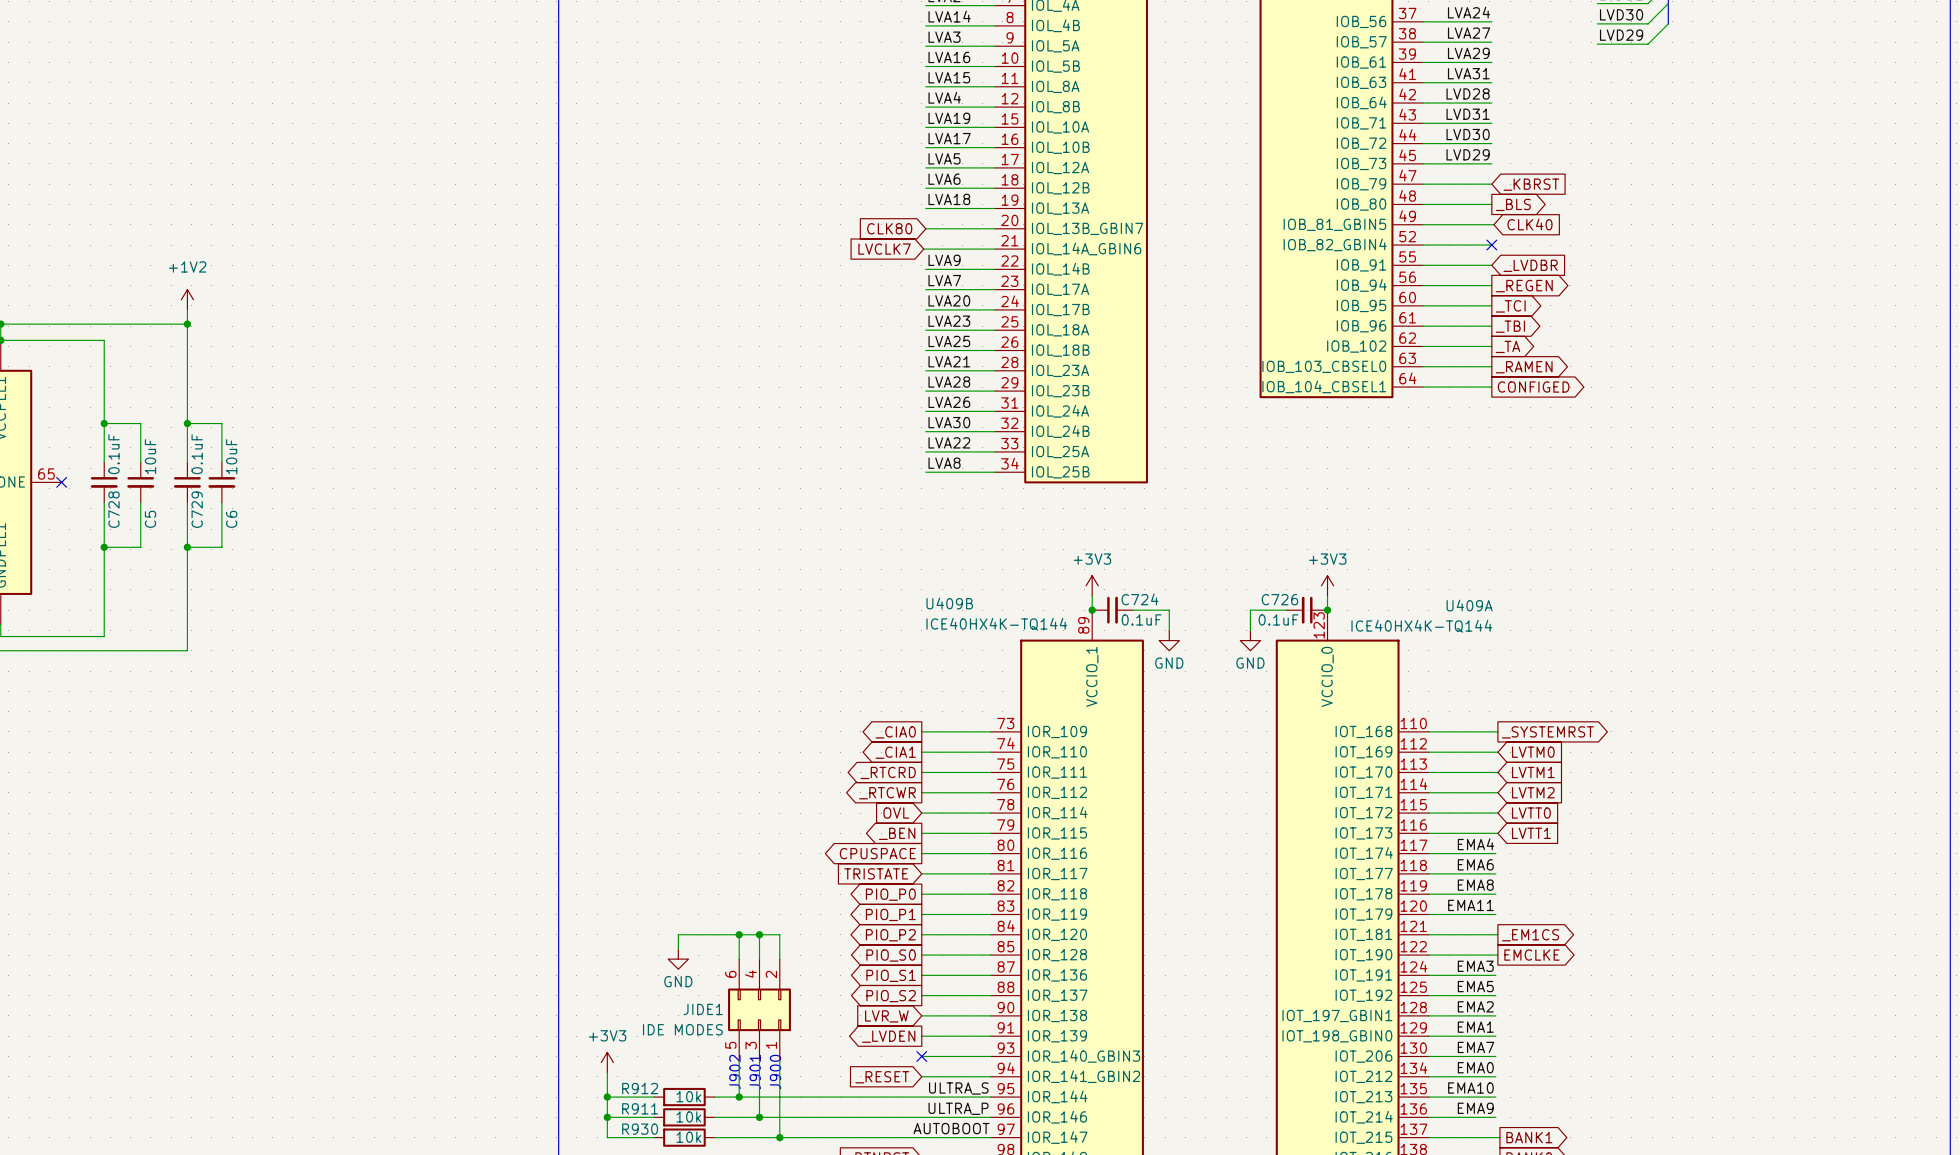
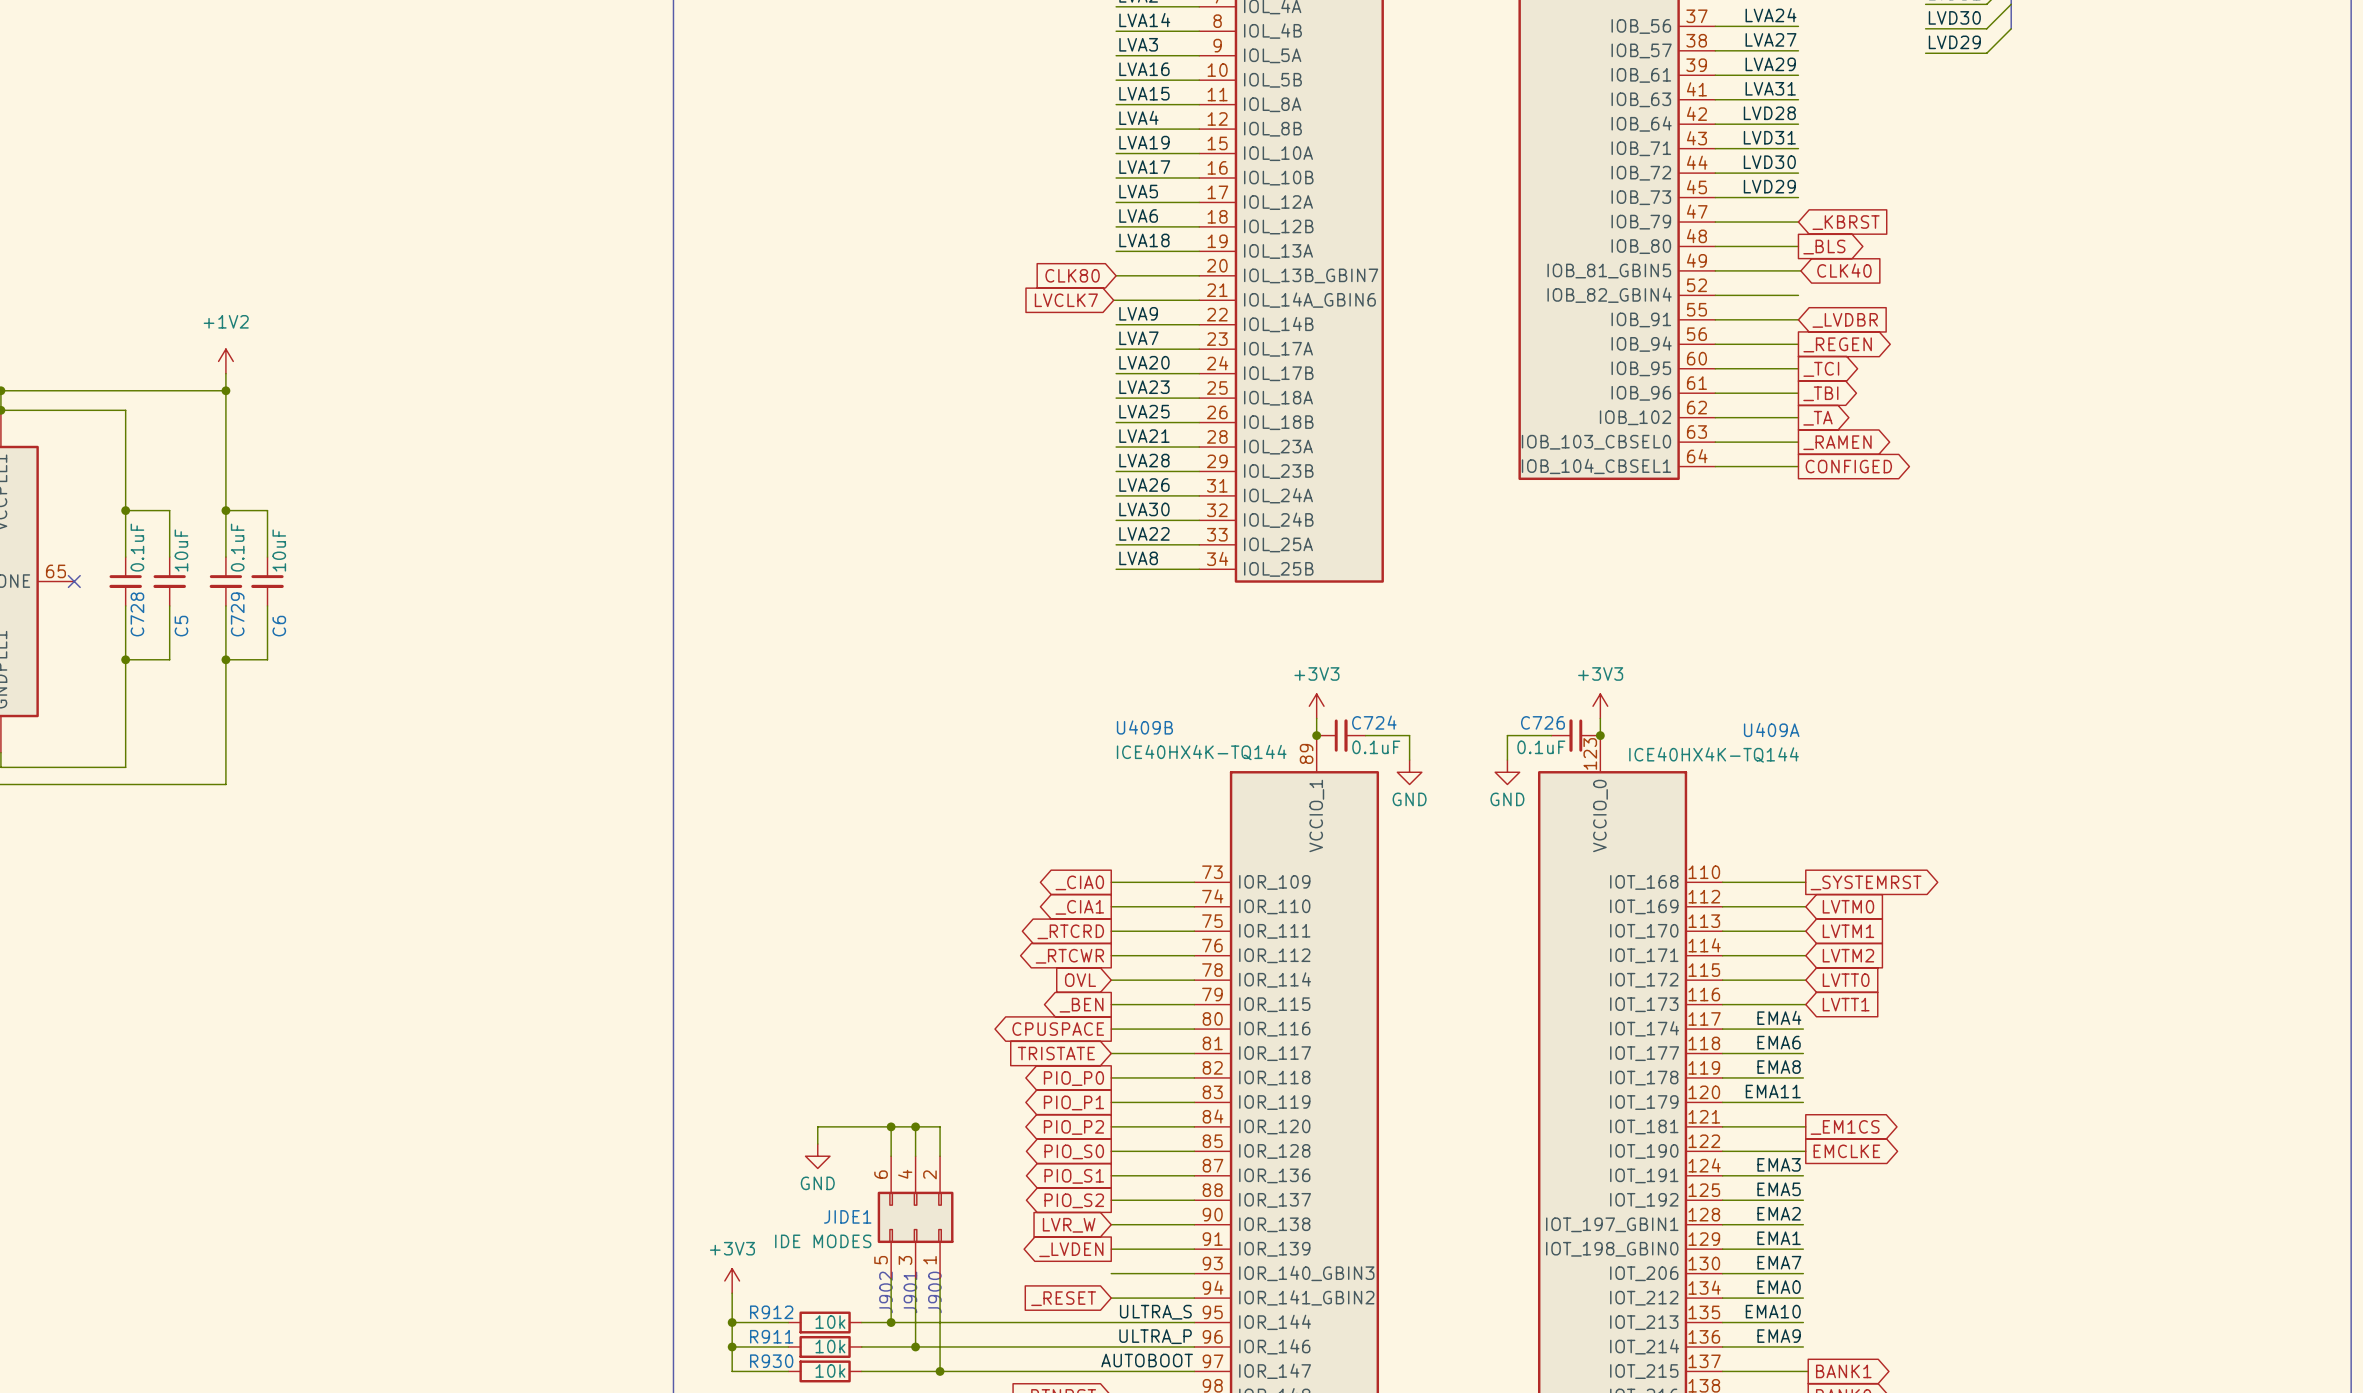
no-connect mark: (1491, 245) -> none
no-connect mark: (921, 1056) -> none

